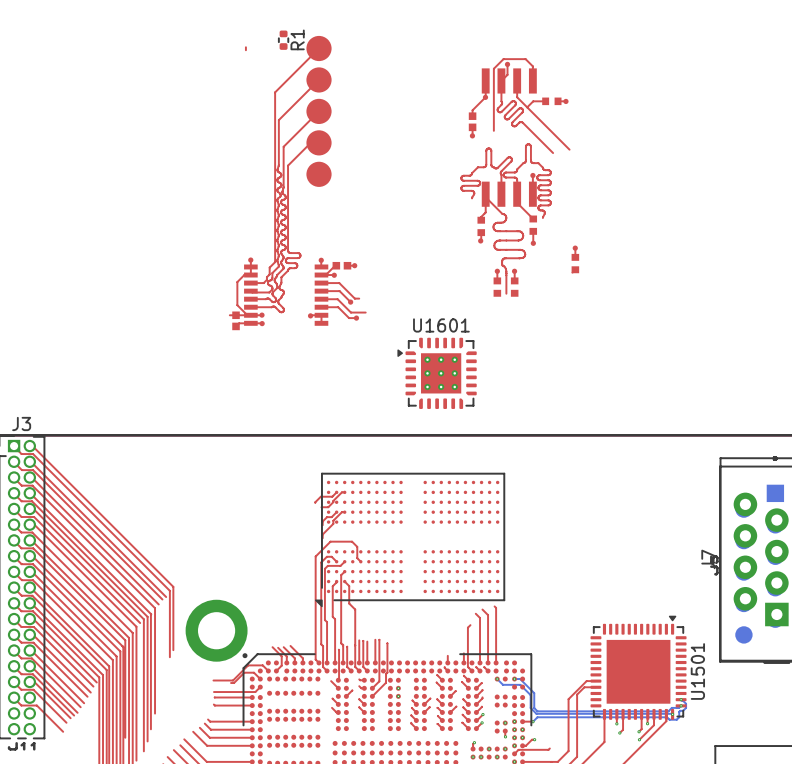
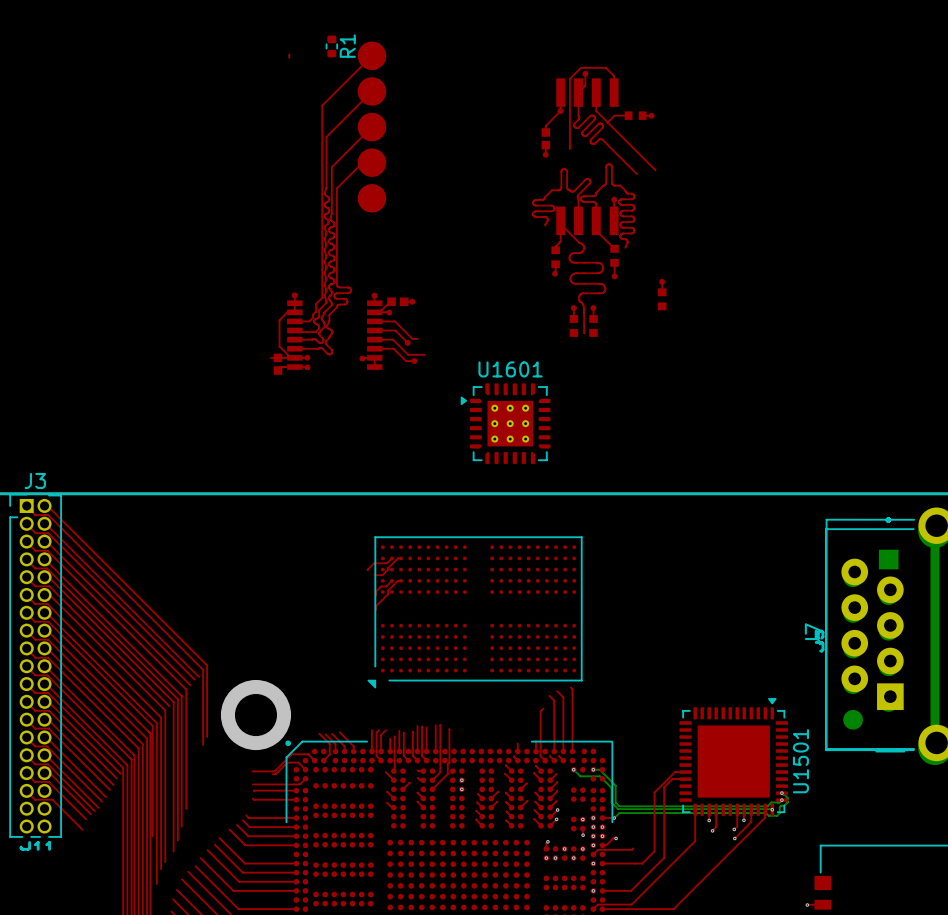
top track: (336, 561) (331, 556) (326, 556) (321, 562) (321, 644) (323, 646) -> (378, 730) (376, 732)
top track: (344, 561) (340, 565) (327, 565) (324, 568) (327, 648) -> (385, 730) (381, 735)
top track: (360, 561) (357, 558) (357, 546) (352, 541) (330, 541) (315, 556) (315, 659) (319, 662) -> (371, 730) (371, 751)
top track: (344, 571) (341, 575) (341, 643) (343, 645) -> none
top track: (336, 581) (332, 586) (335, 651) -> none
top track: (344, 581) (349, 586) (349, 603) (355, 609) (355, 645) -> none

